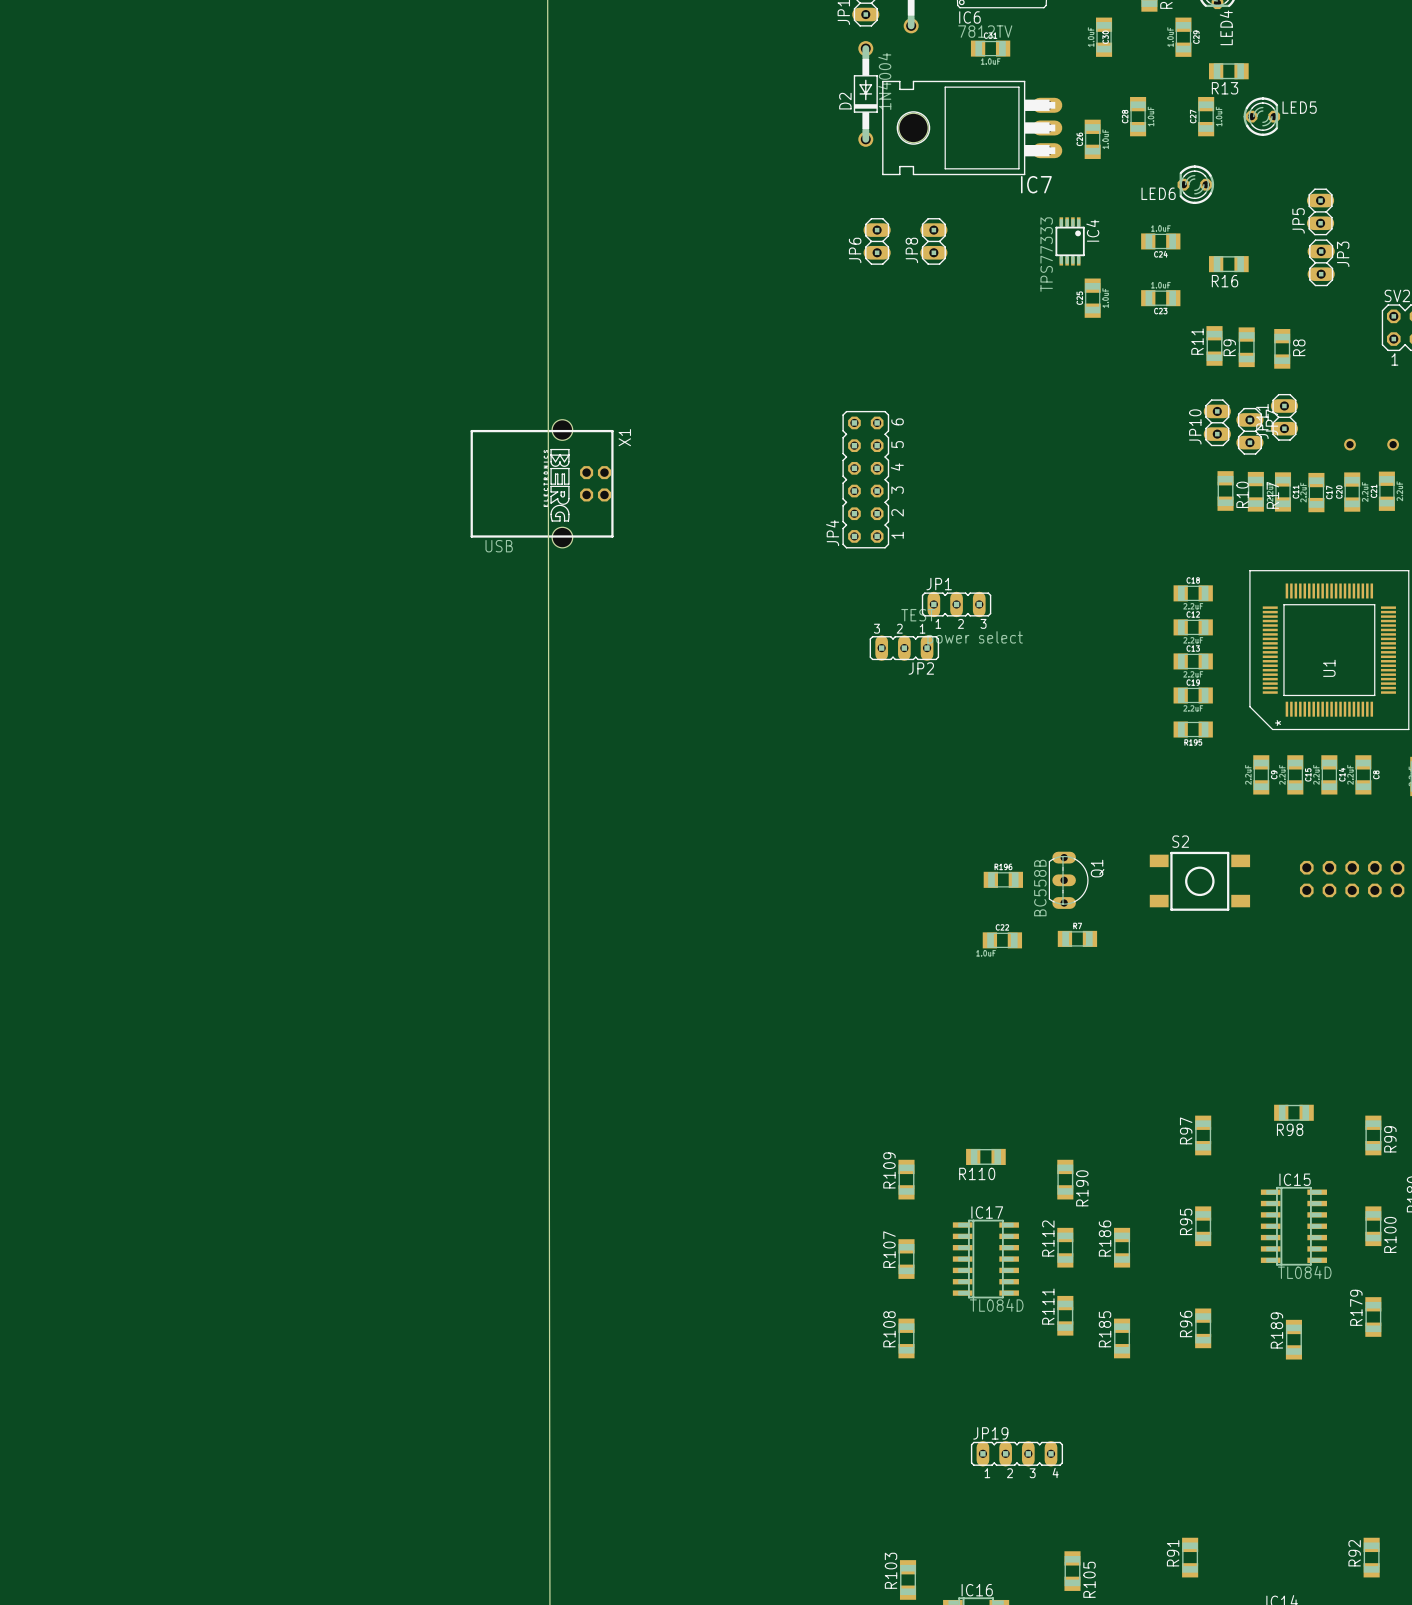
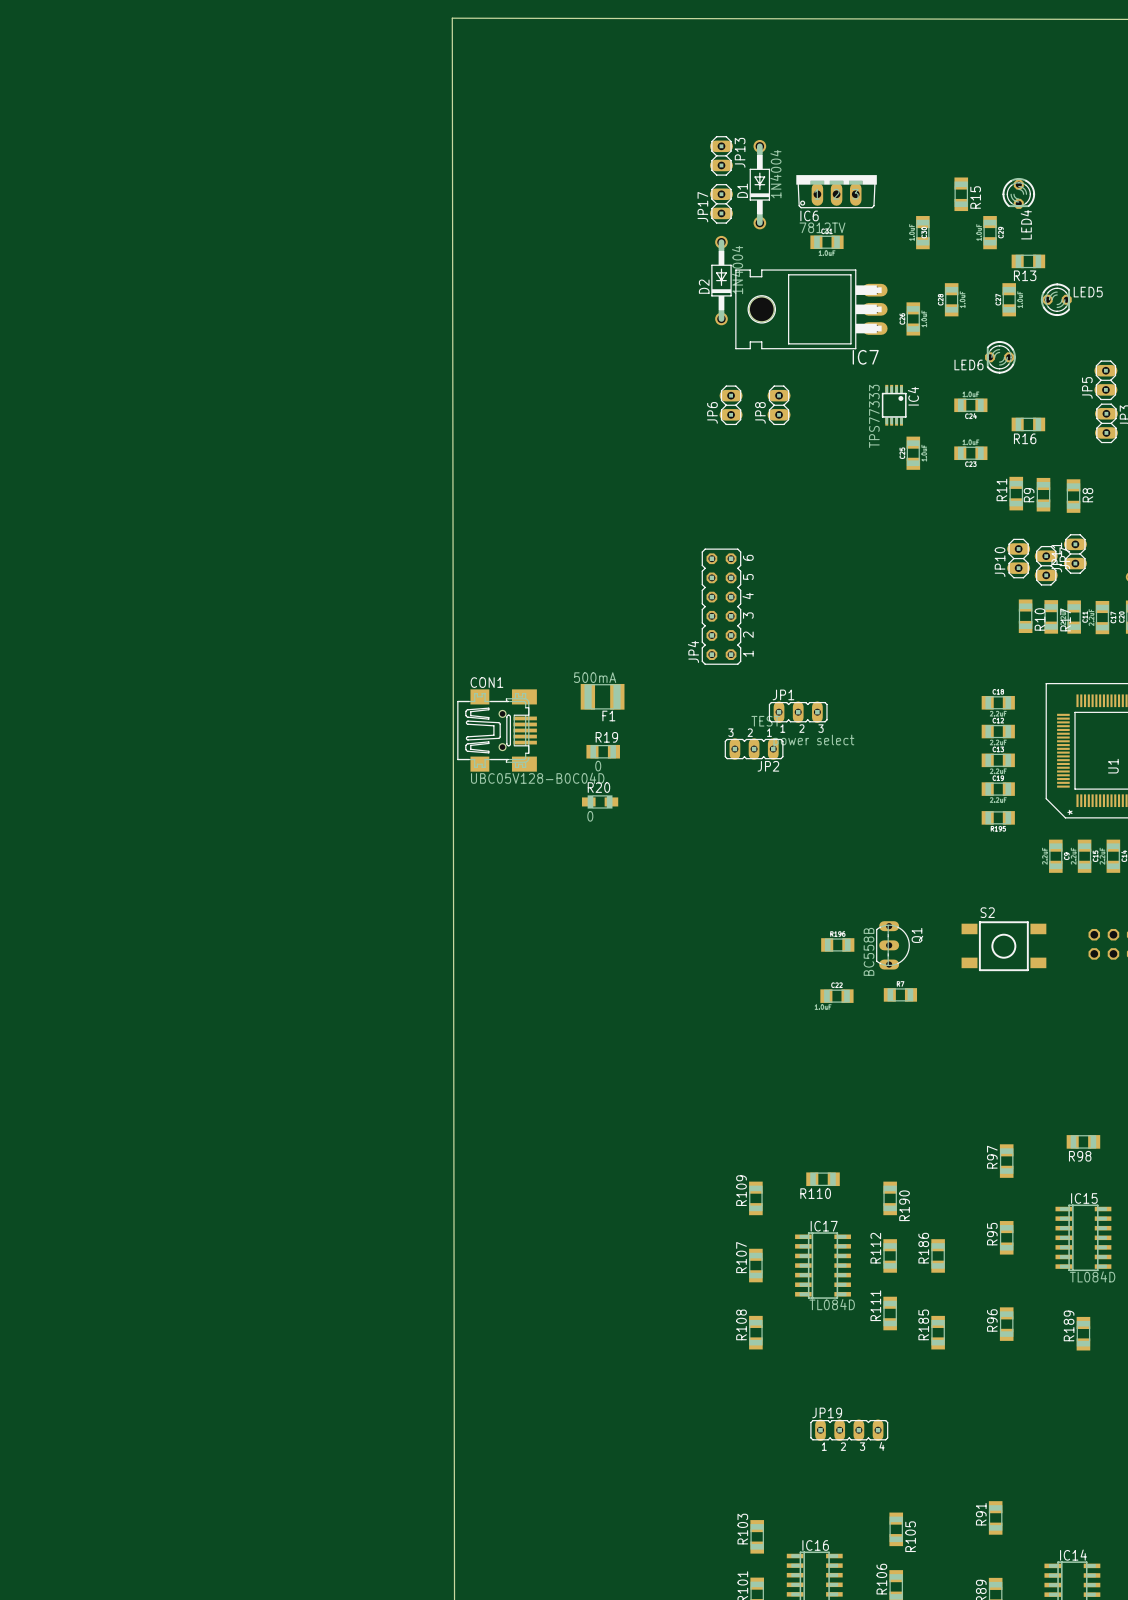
X1: USB (542, 483) -> none
F1: none -> 500mA (602, 696)
CON1: none -> UBC05V128-B0C04D (497, 730)
R19: none -> 0 (603, 751)
R20: none -> 0 (600, 801)

